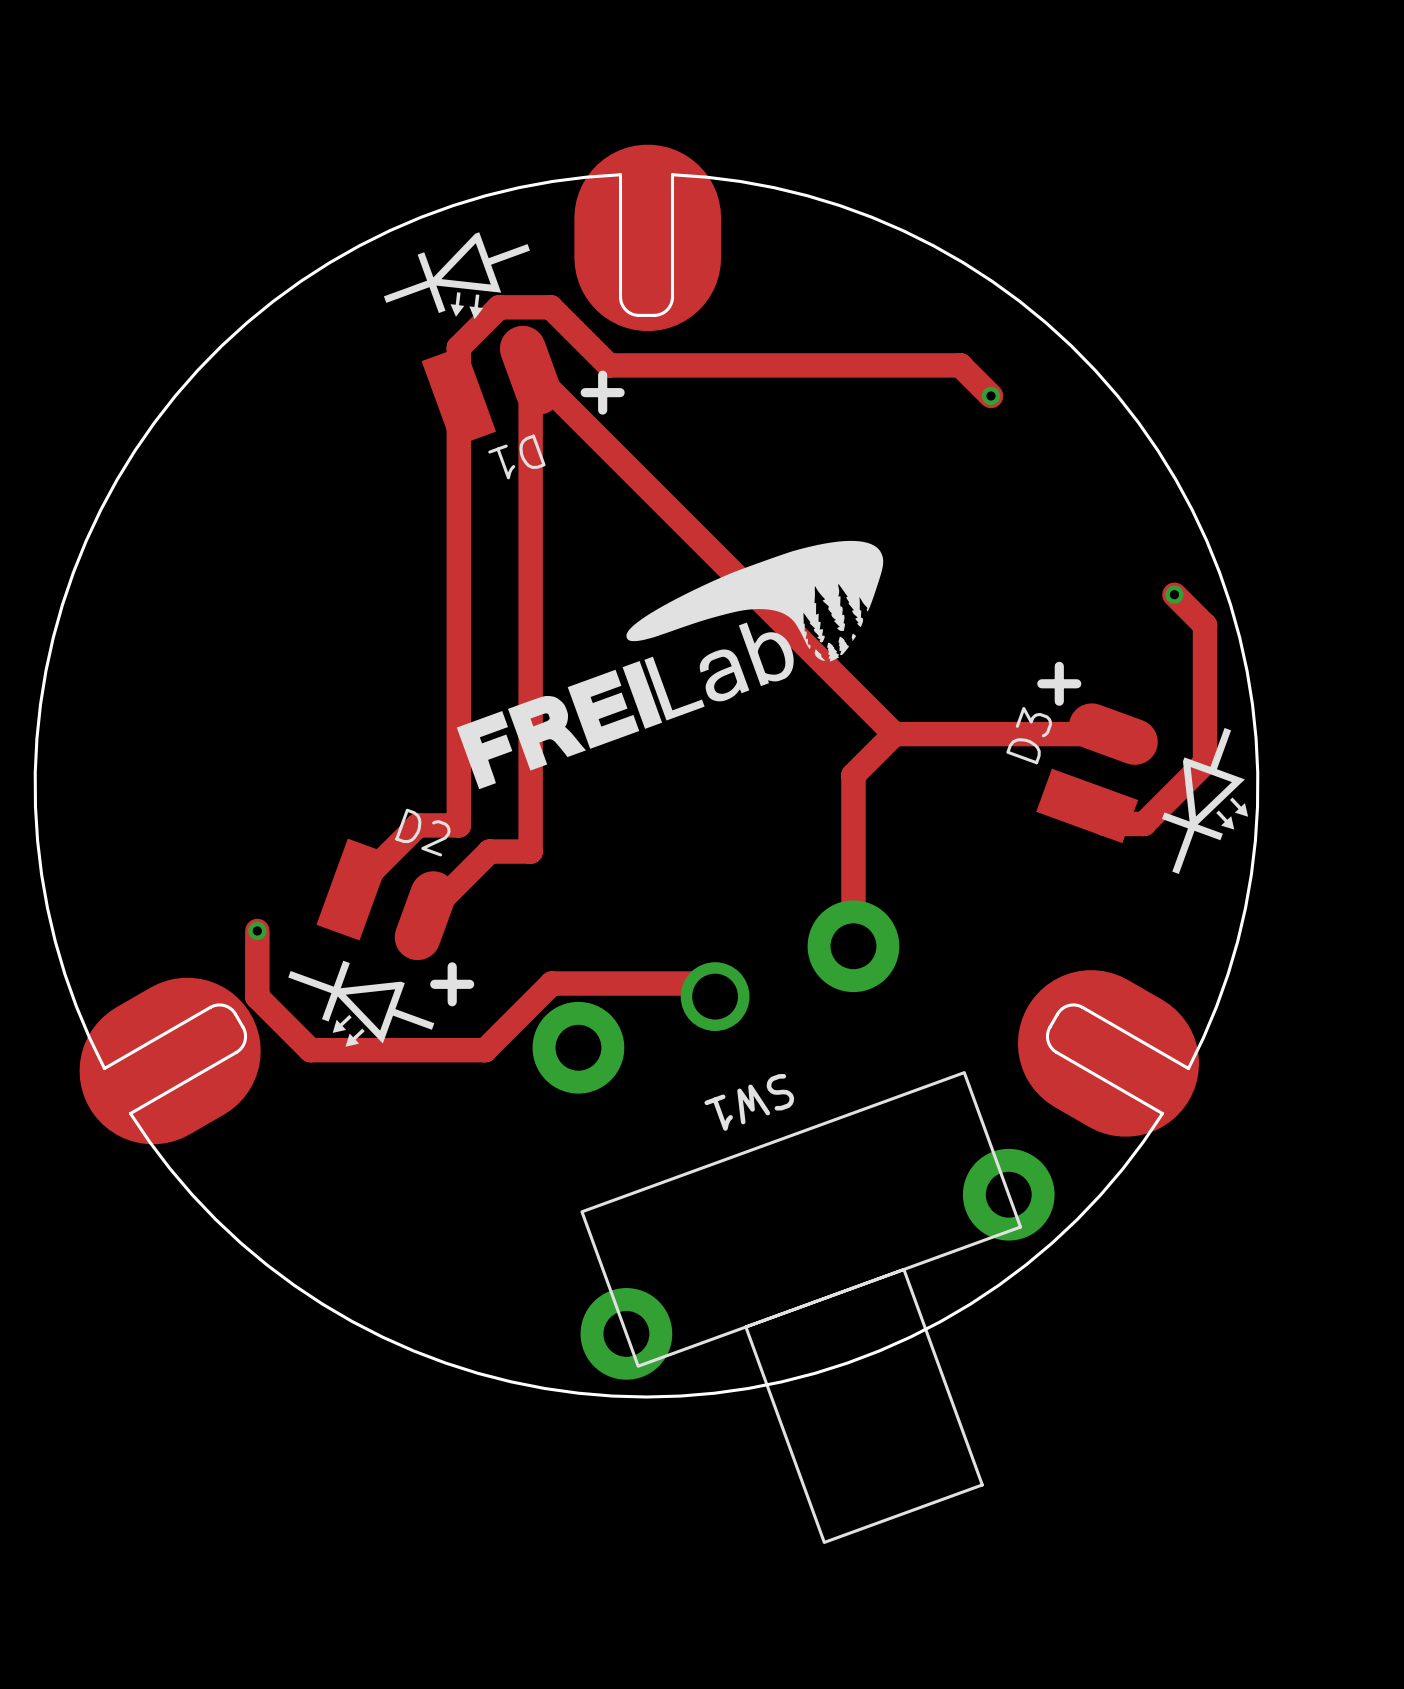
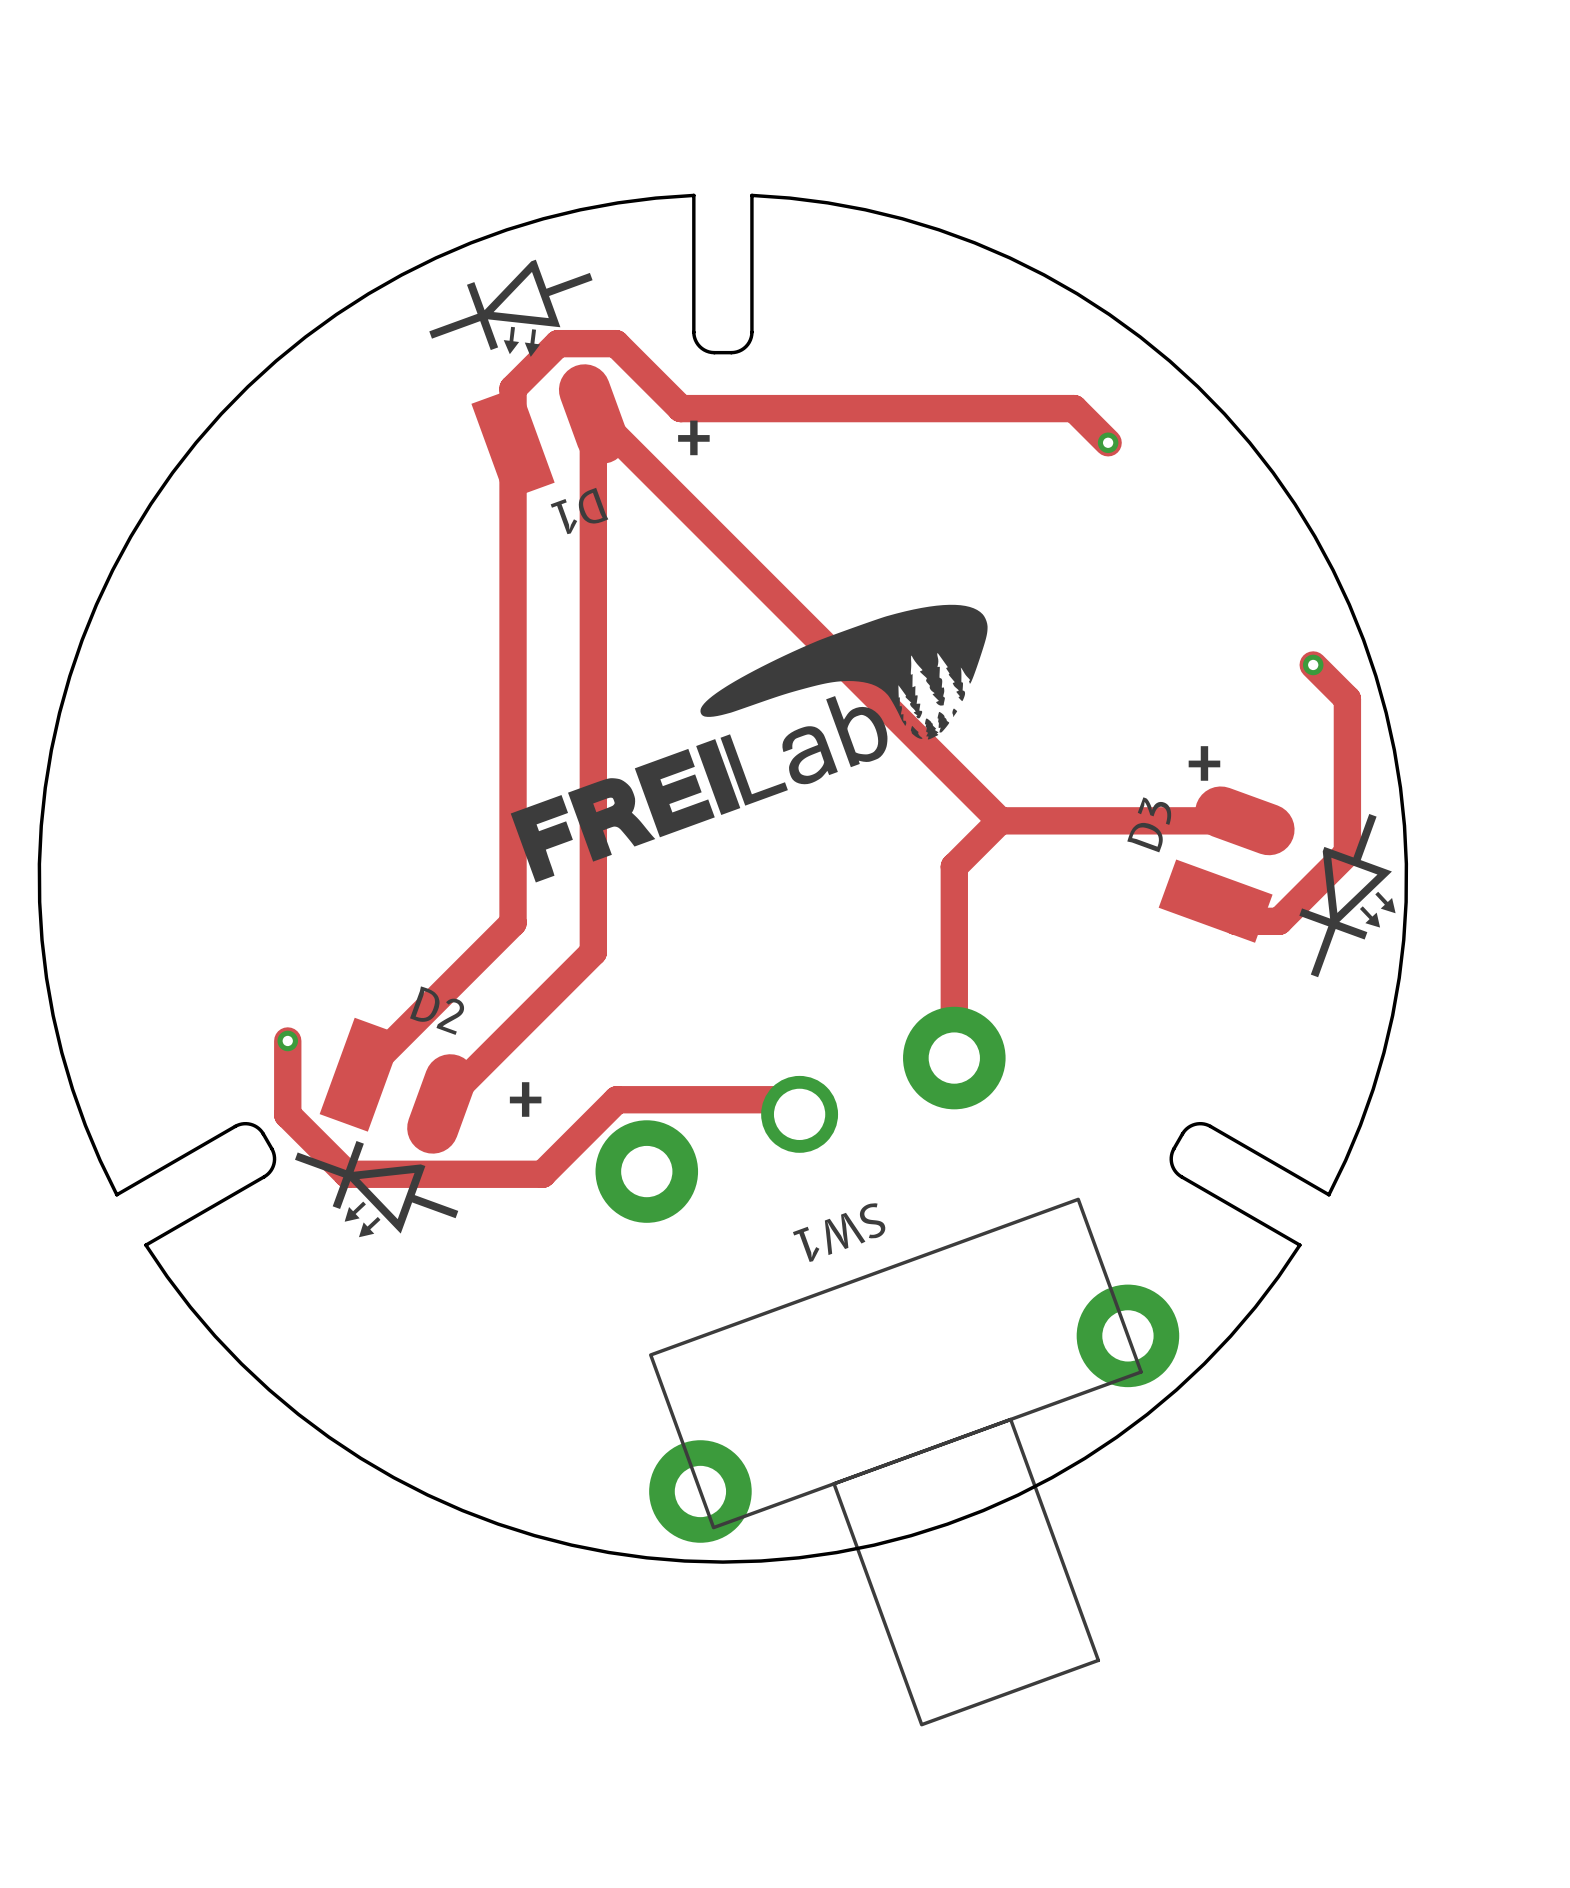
part: (647, 237) -> none
track: (458, 825) (417, 825) (353, 889) -> (513, 922) (361, 1074)
track: (530, 851) (489, 851) (425, 915) -> (593, 952) (441, 1103)
D2 position: (386, 899) -> (397, 1085)
drawing position: (361, 1003) -> (376, 1189)
part: (1108, 1053) -> none
part: (170, 1061) -> none

